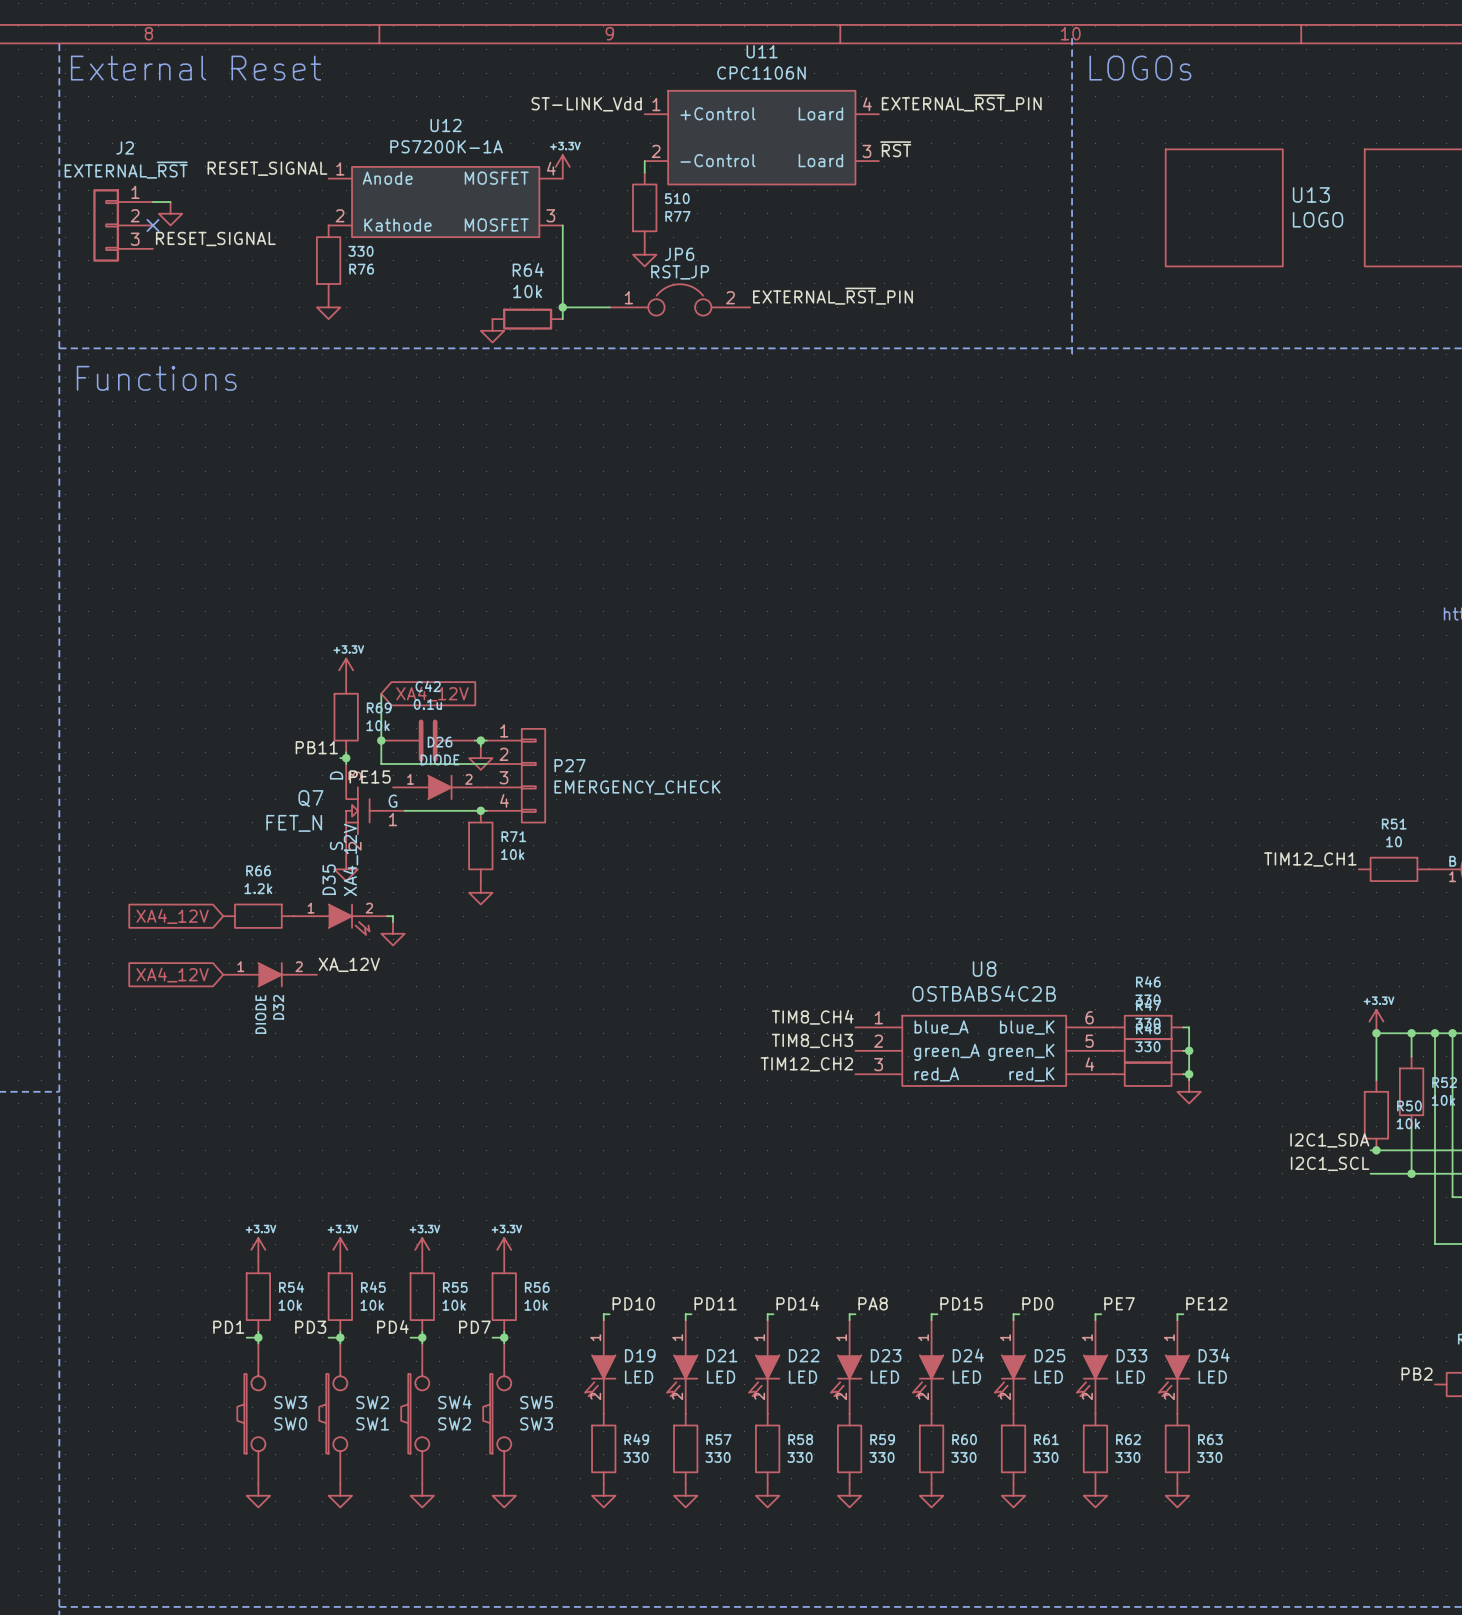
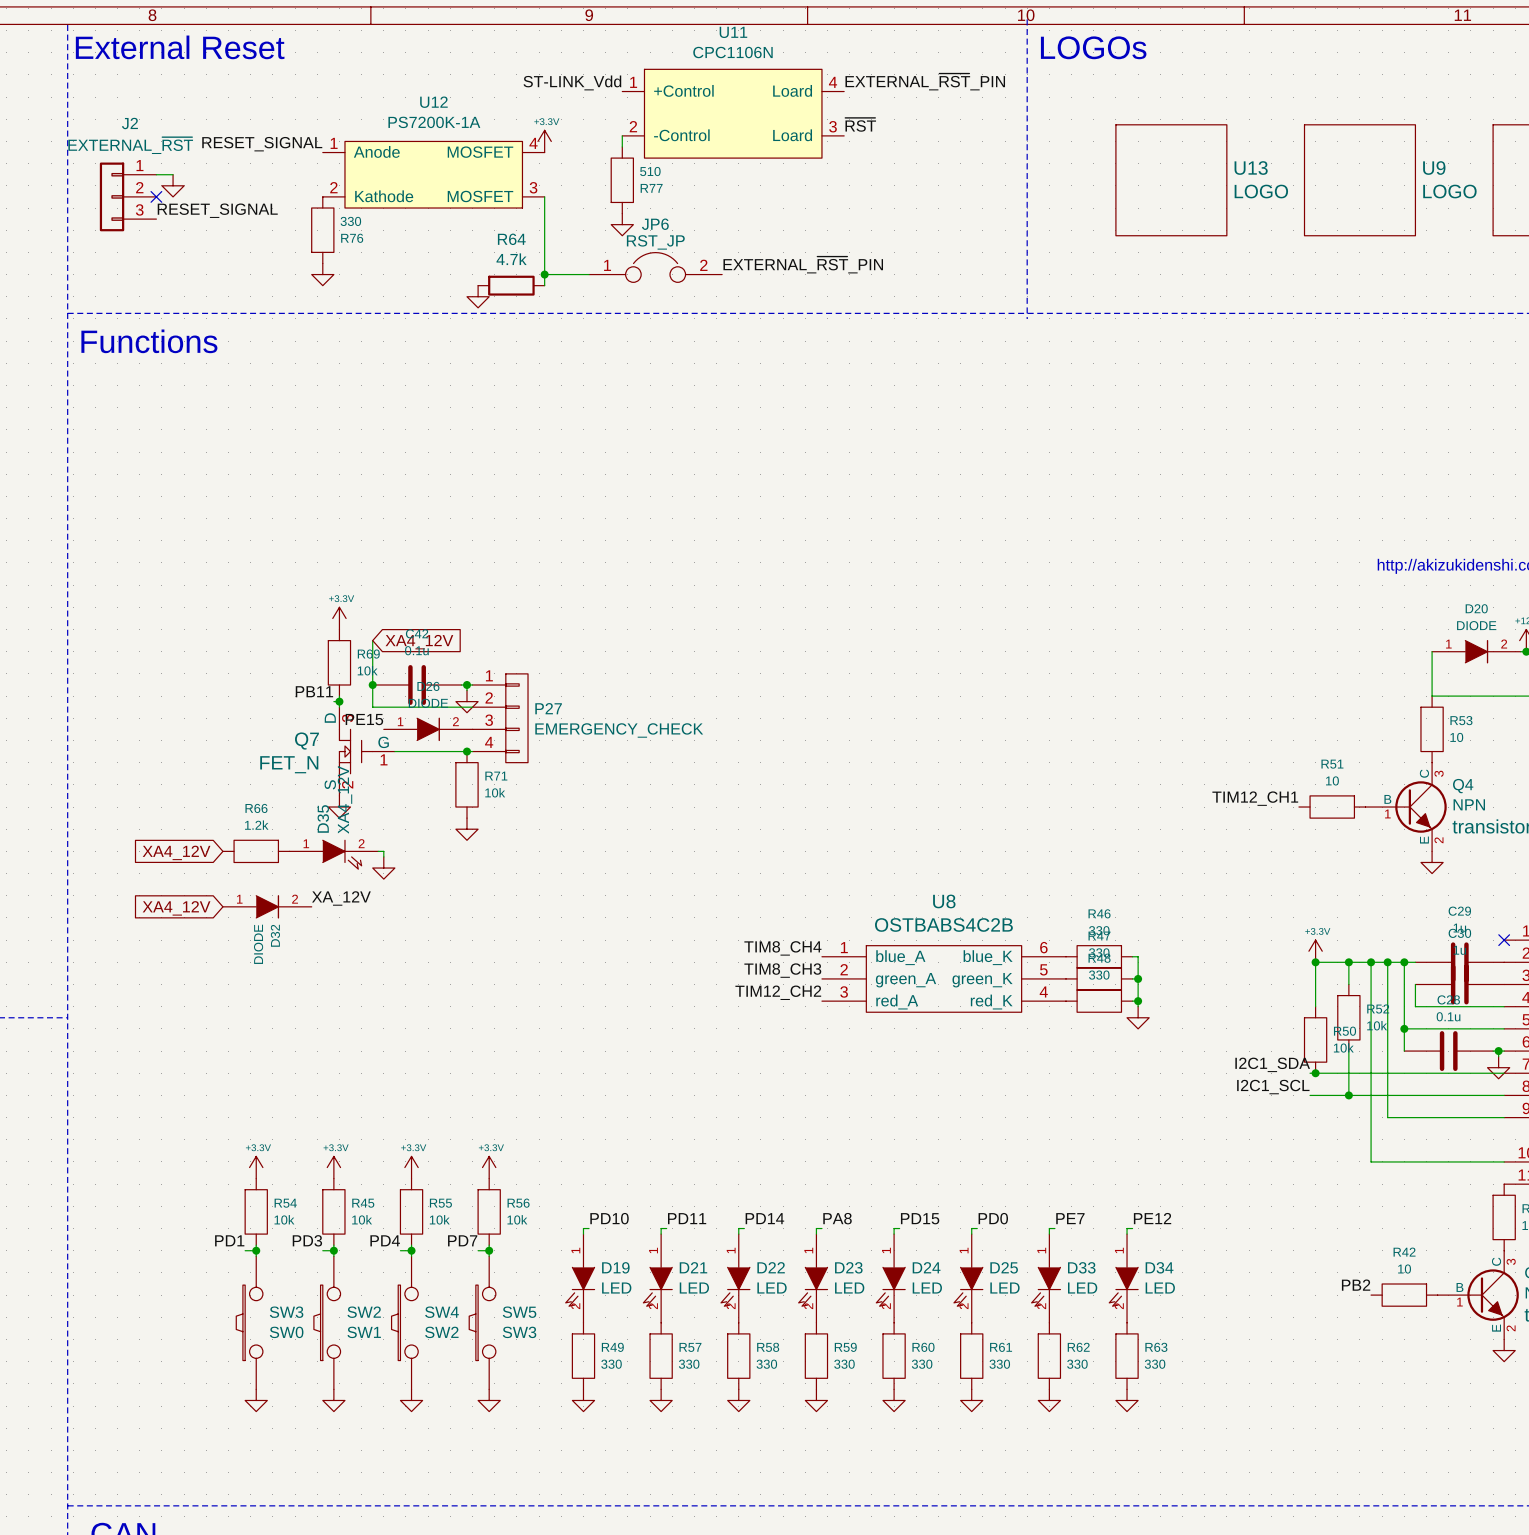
R64 value: 10k (527, 291) -> 4.7k (511, 259)

